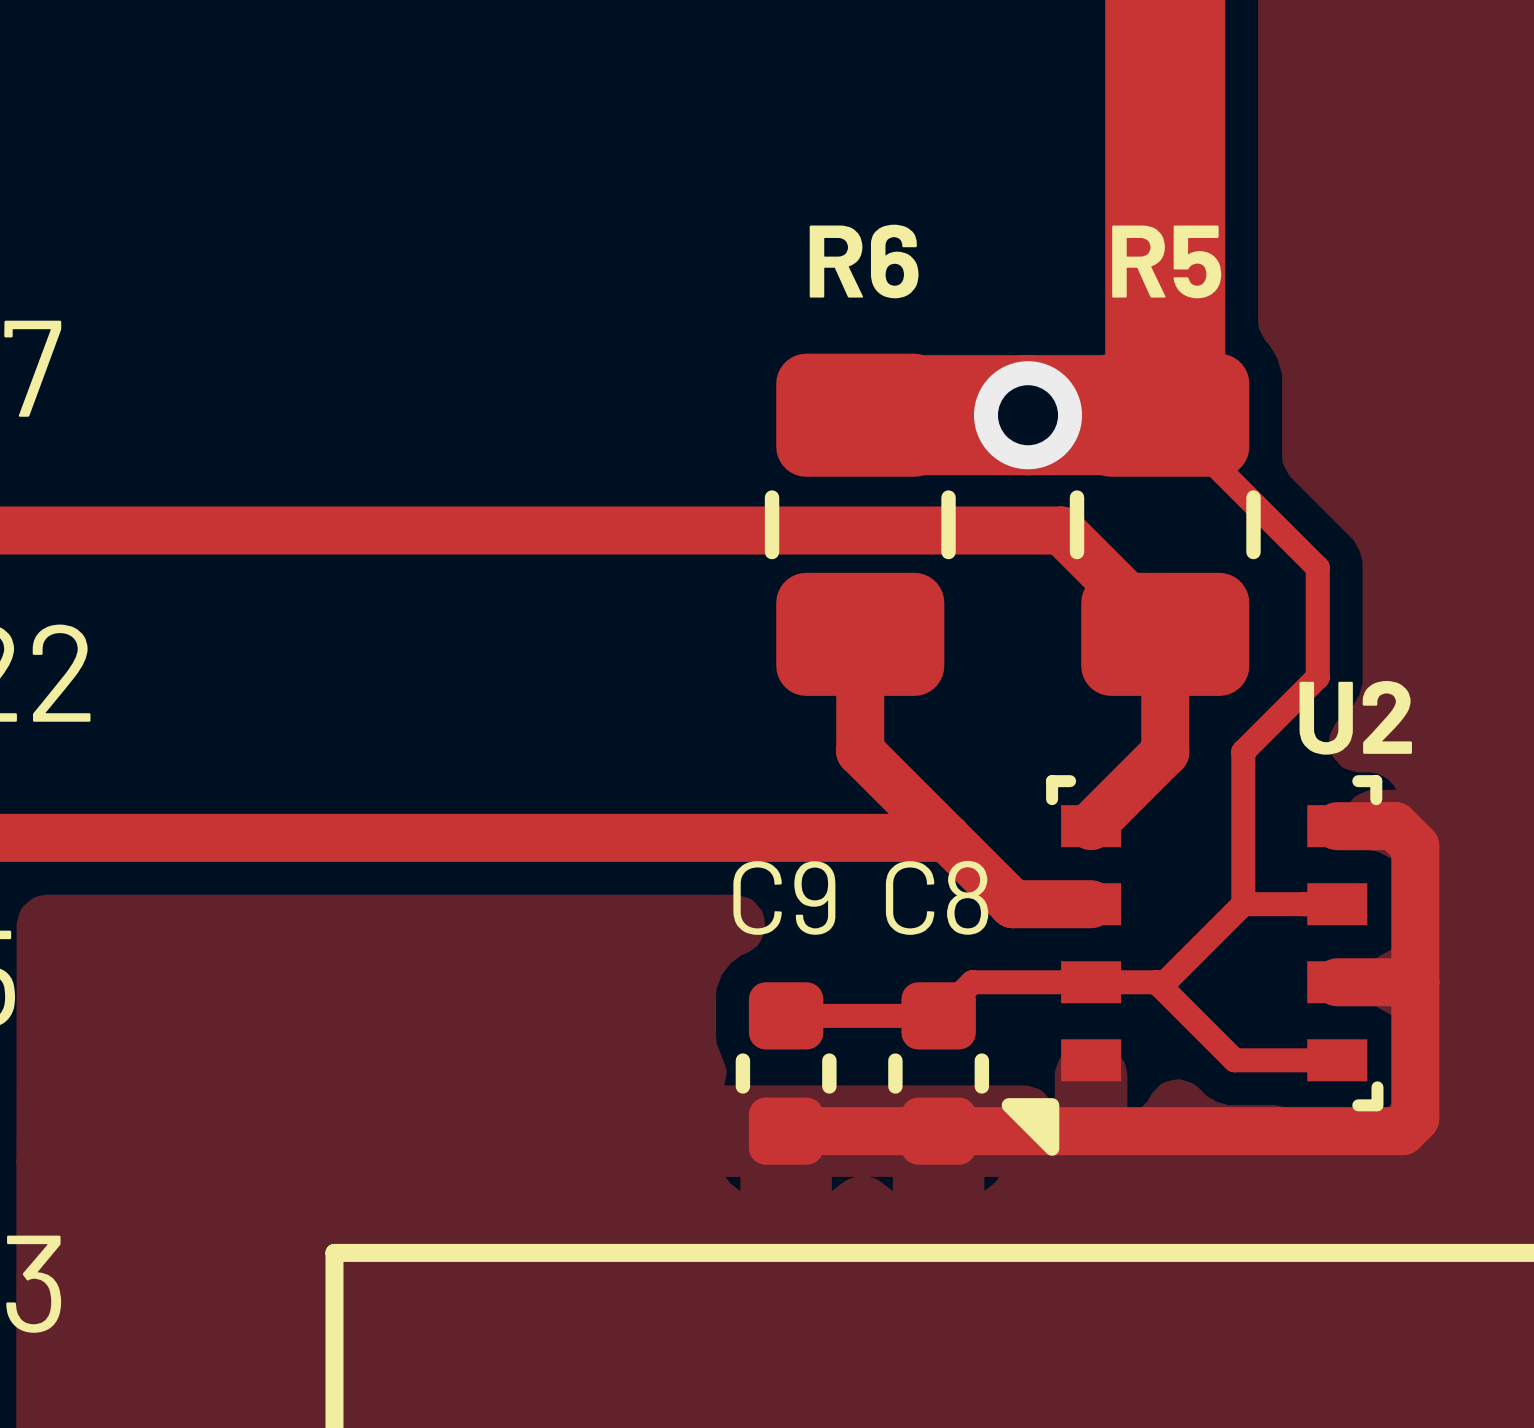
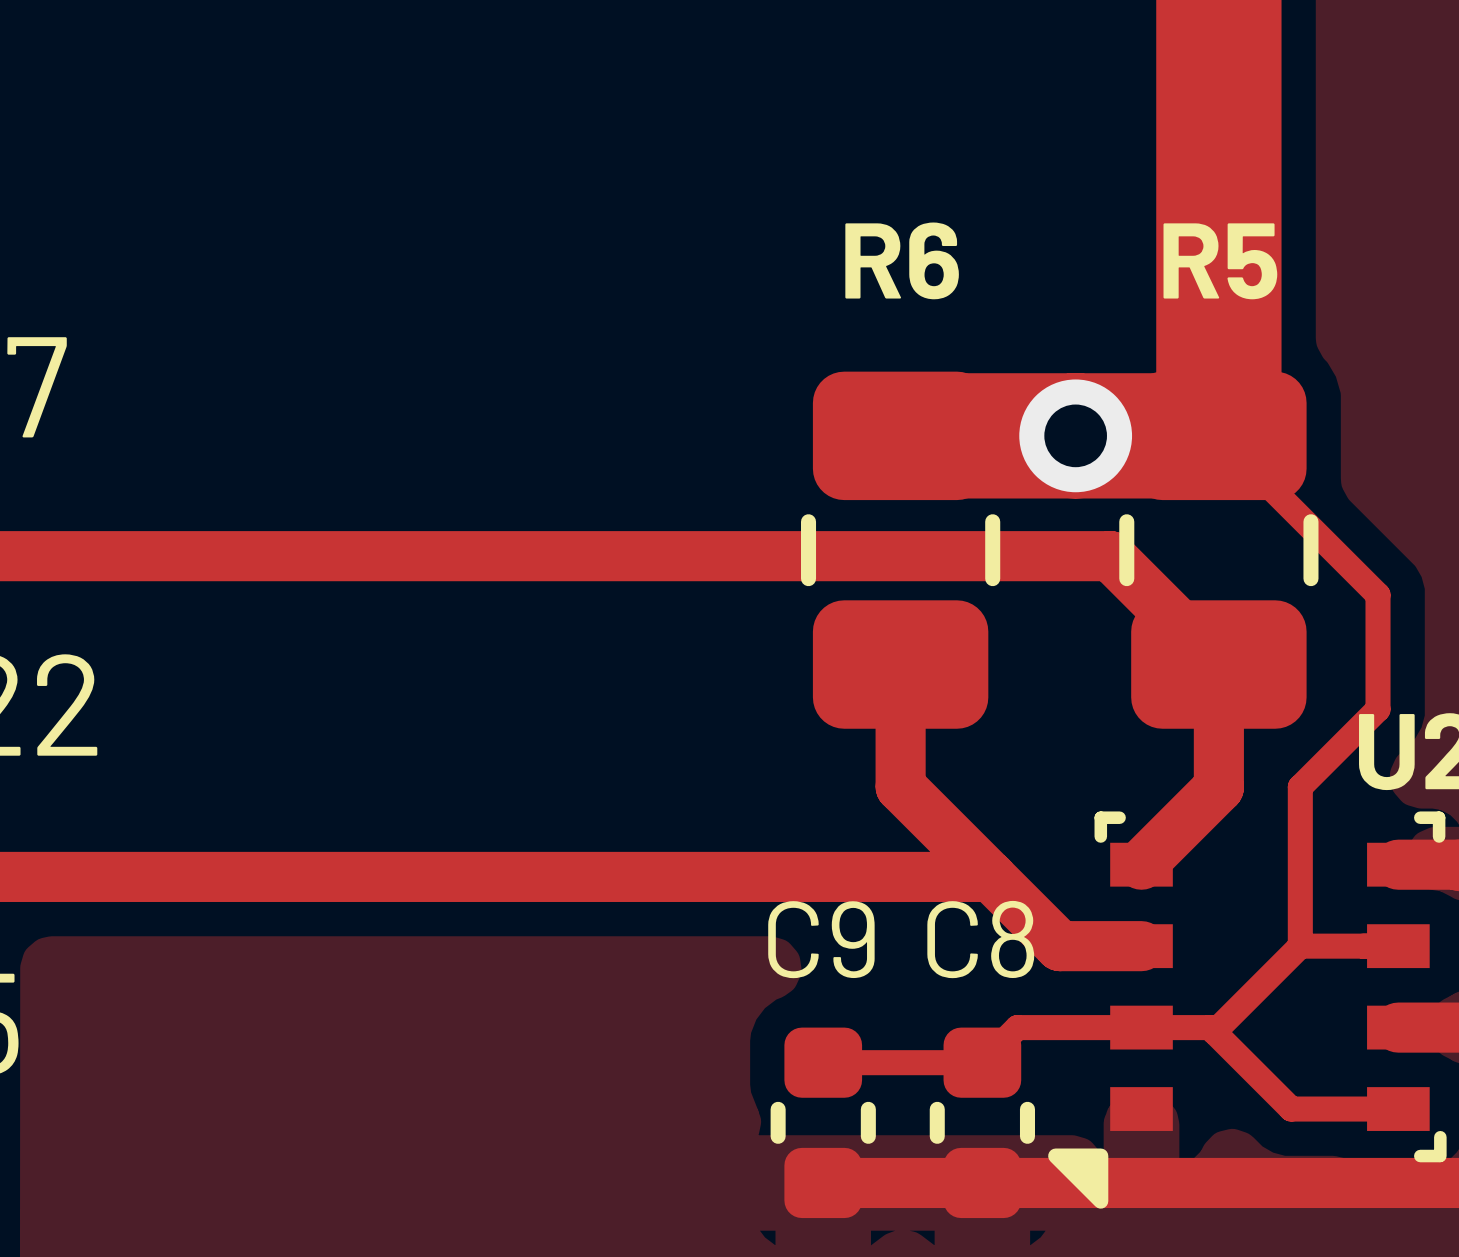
R6 name position: R6 (864, 261) -> R6 (902, 260)
R5 name position: R5 (1166, 261) -> R5 (1220, 261)

